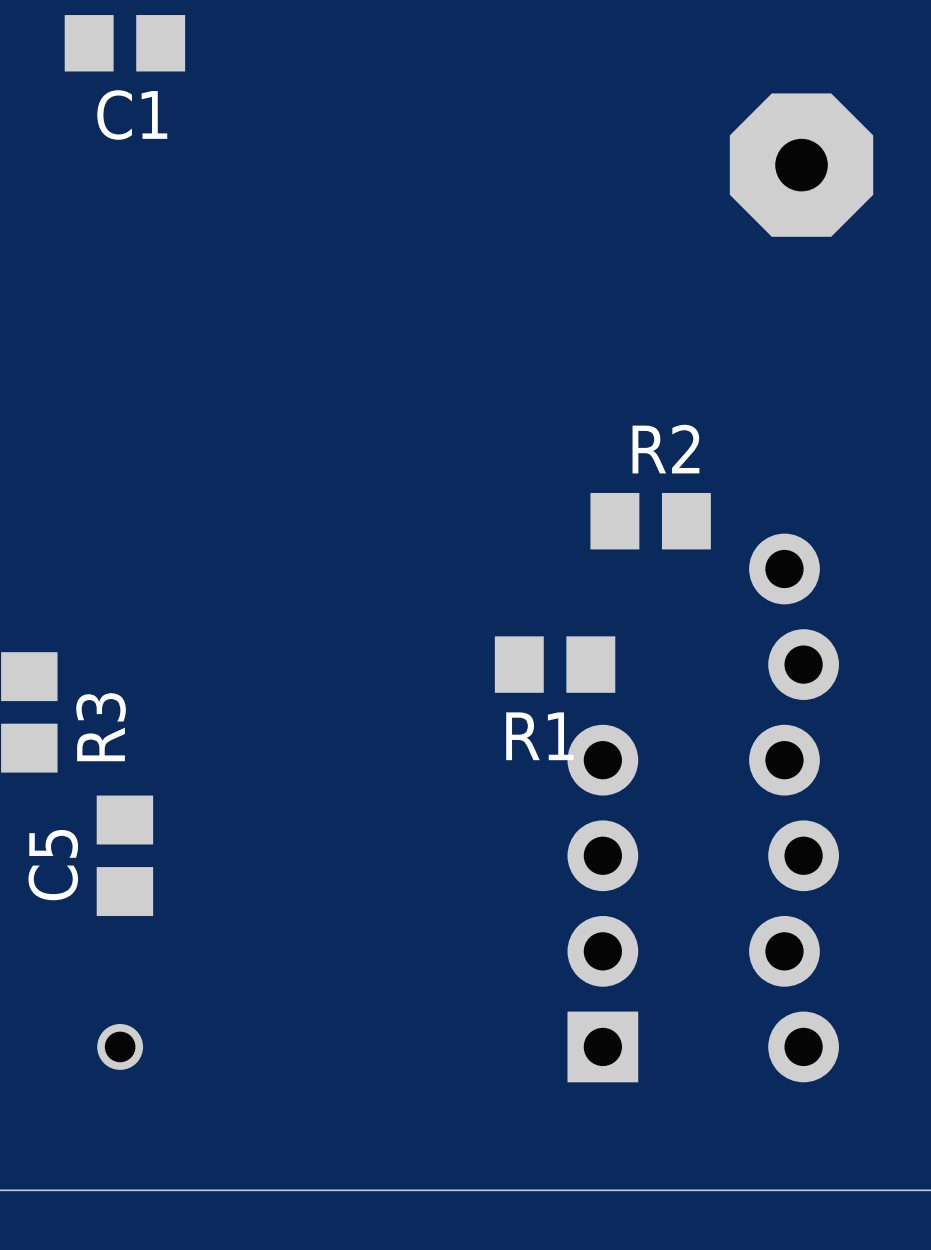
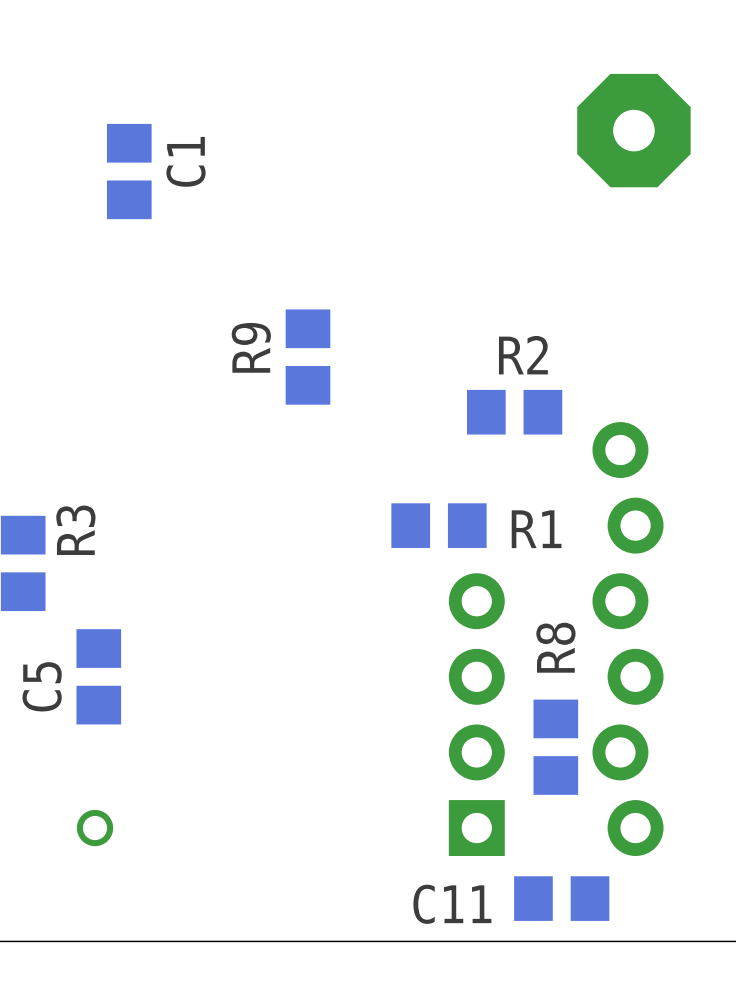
C1 rotation: 0° (124, 43) -> 90° clockwise (129, 171)
C1 position: (124, 43) -> (129, 171)
C1 name position: C1 (132, 114) -> C1 (186, 161)
R9: none -> (307, 357)
R3 name position: R3 (101, 727) -> R3 (75, 530)
R1 name position: R1 (539, 736) -> R1 (536, 529)
R8: none -> (555, 747)
C11: none -> (561, 898)

